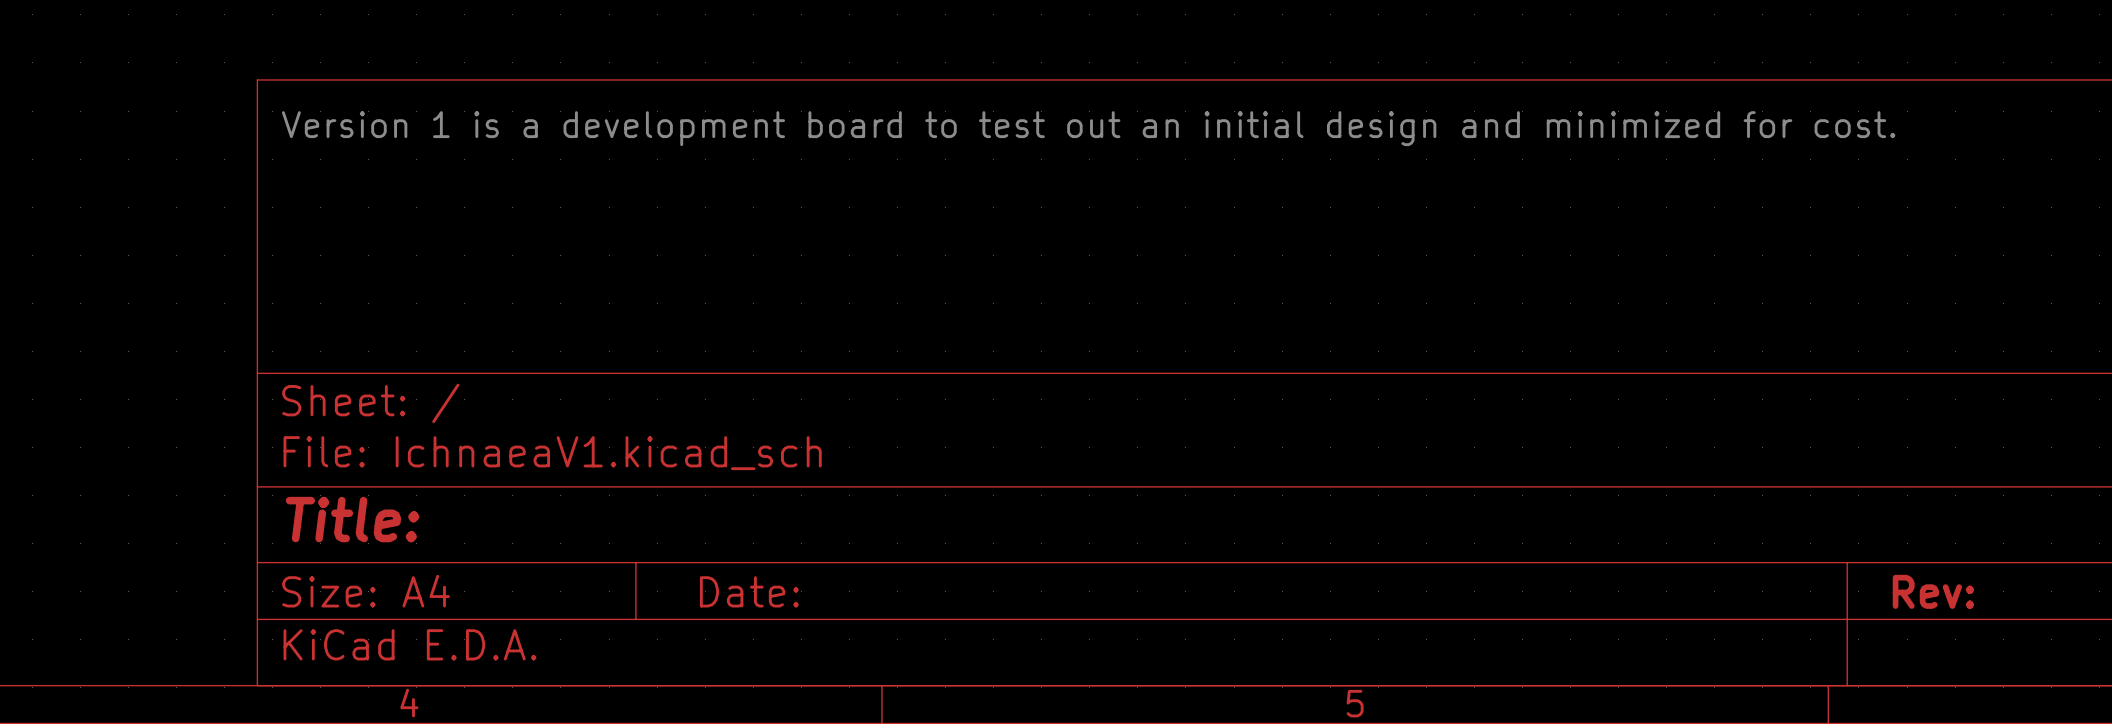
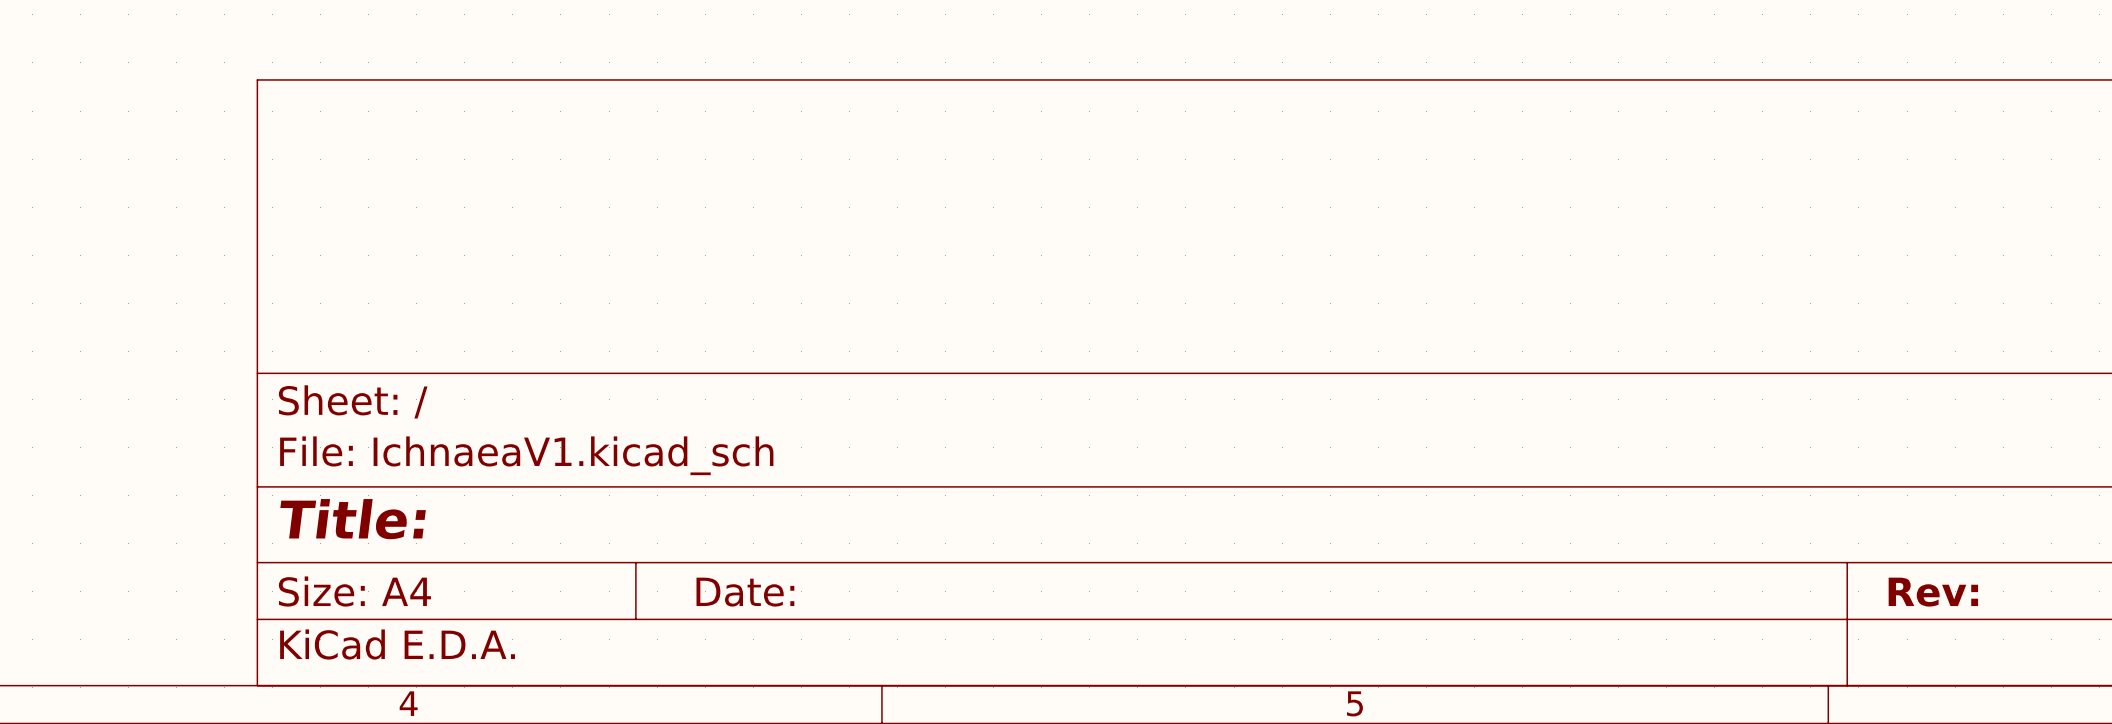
text: Version 1 is a development board to test out an initial design and minimized for cost. (1088, 128) -> none

